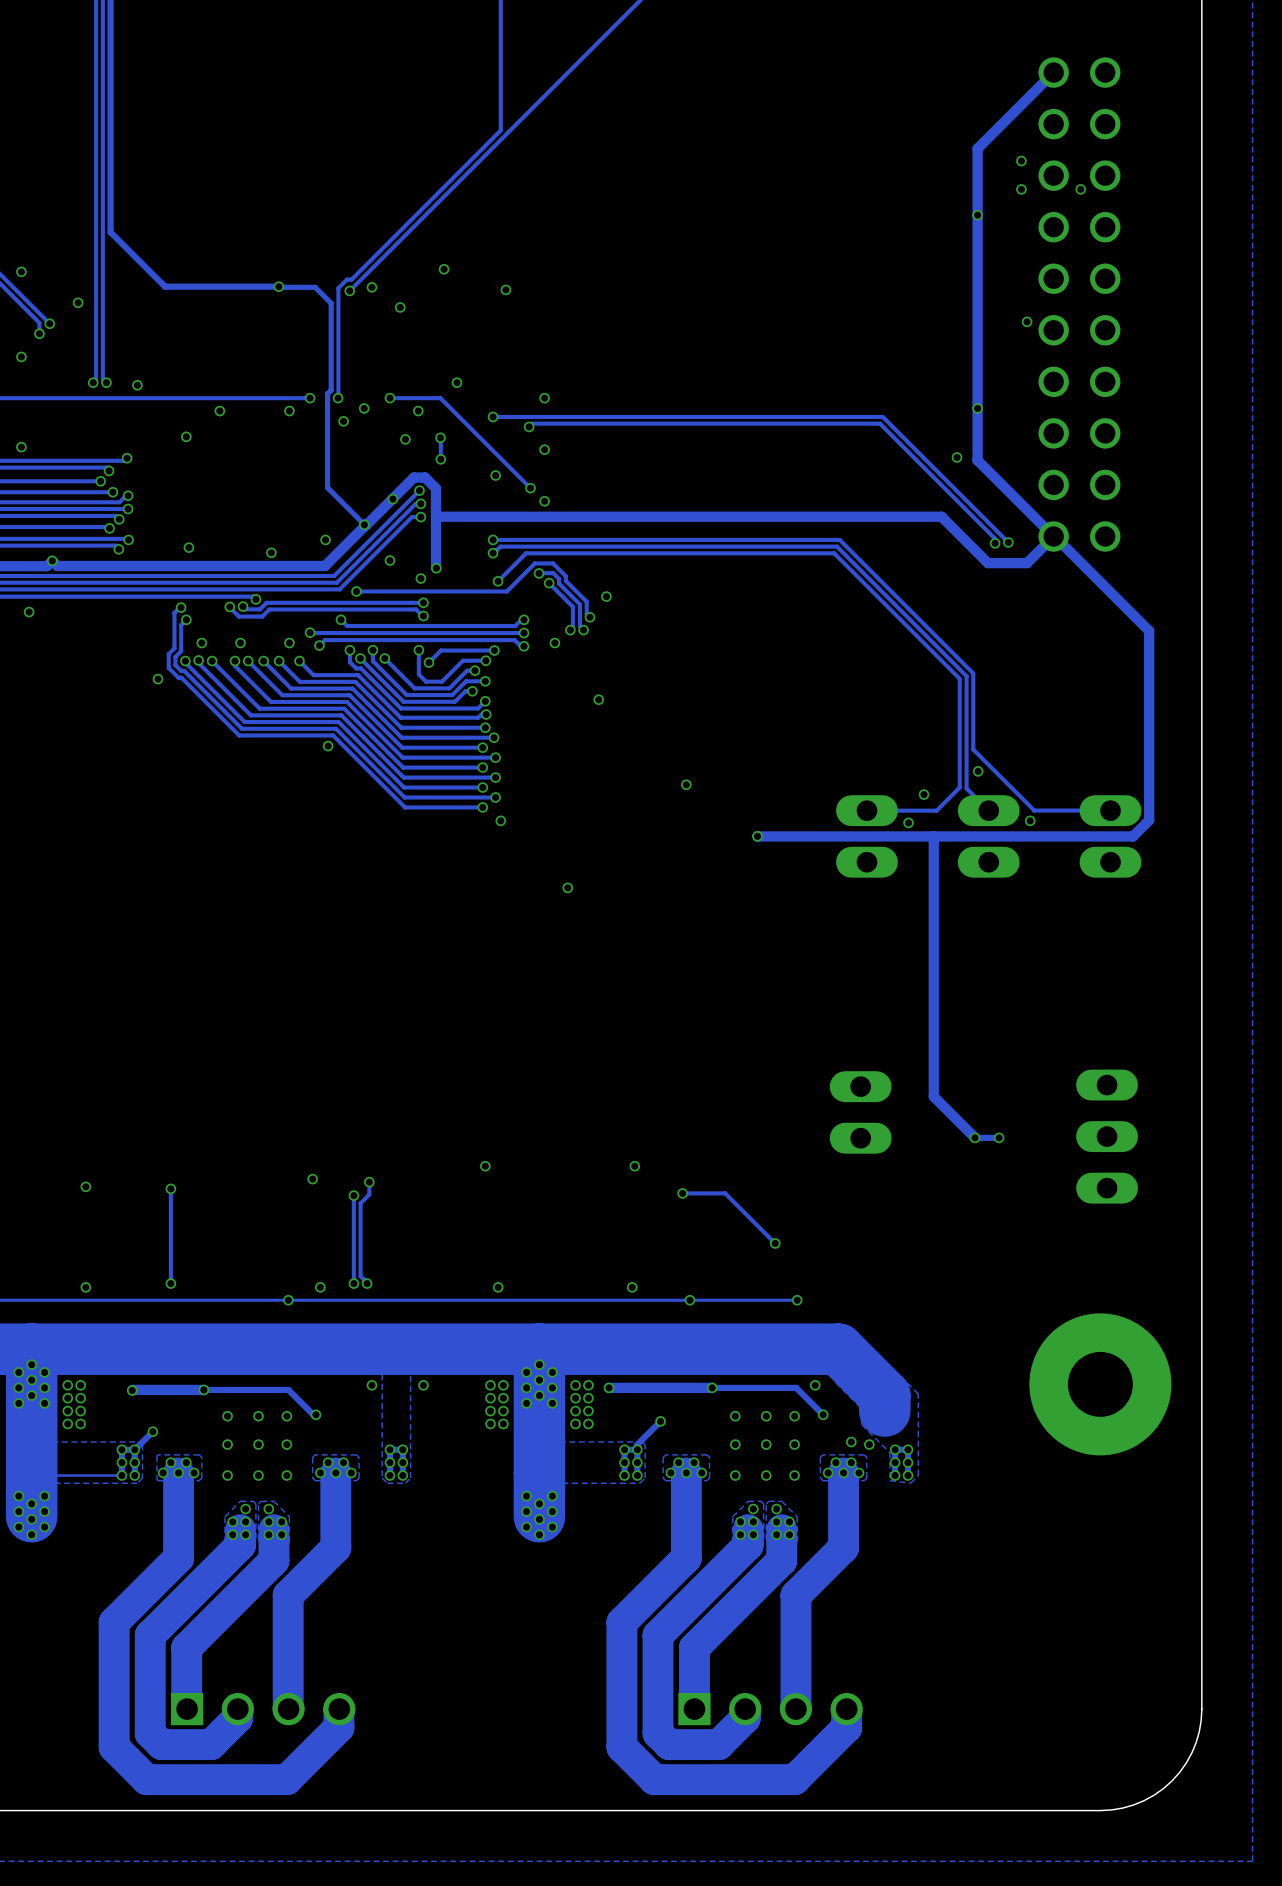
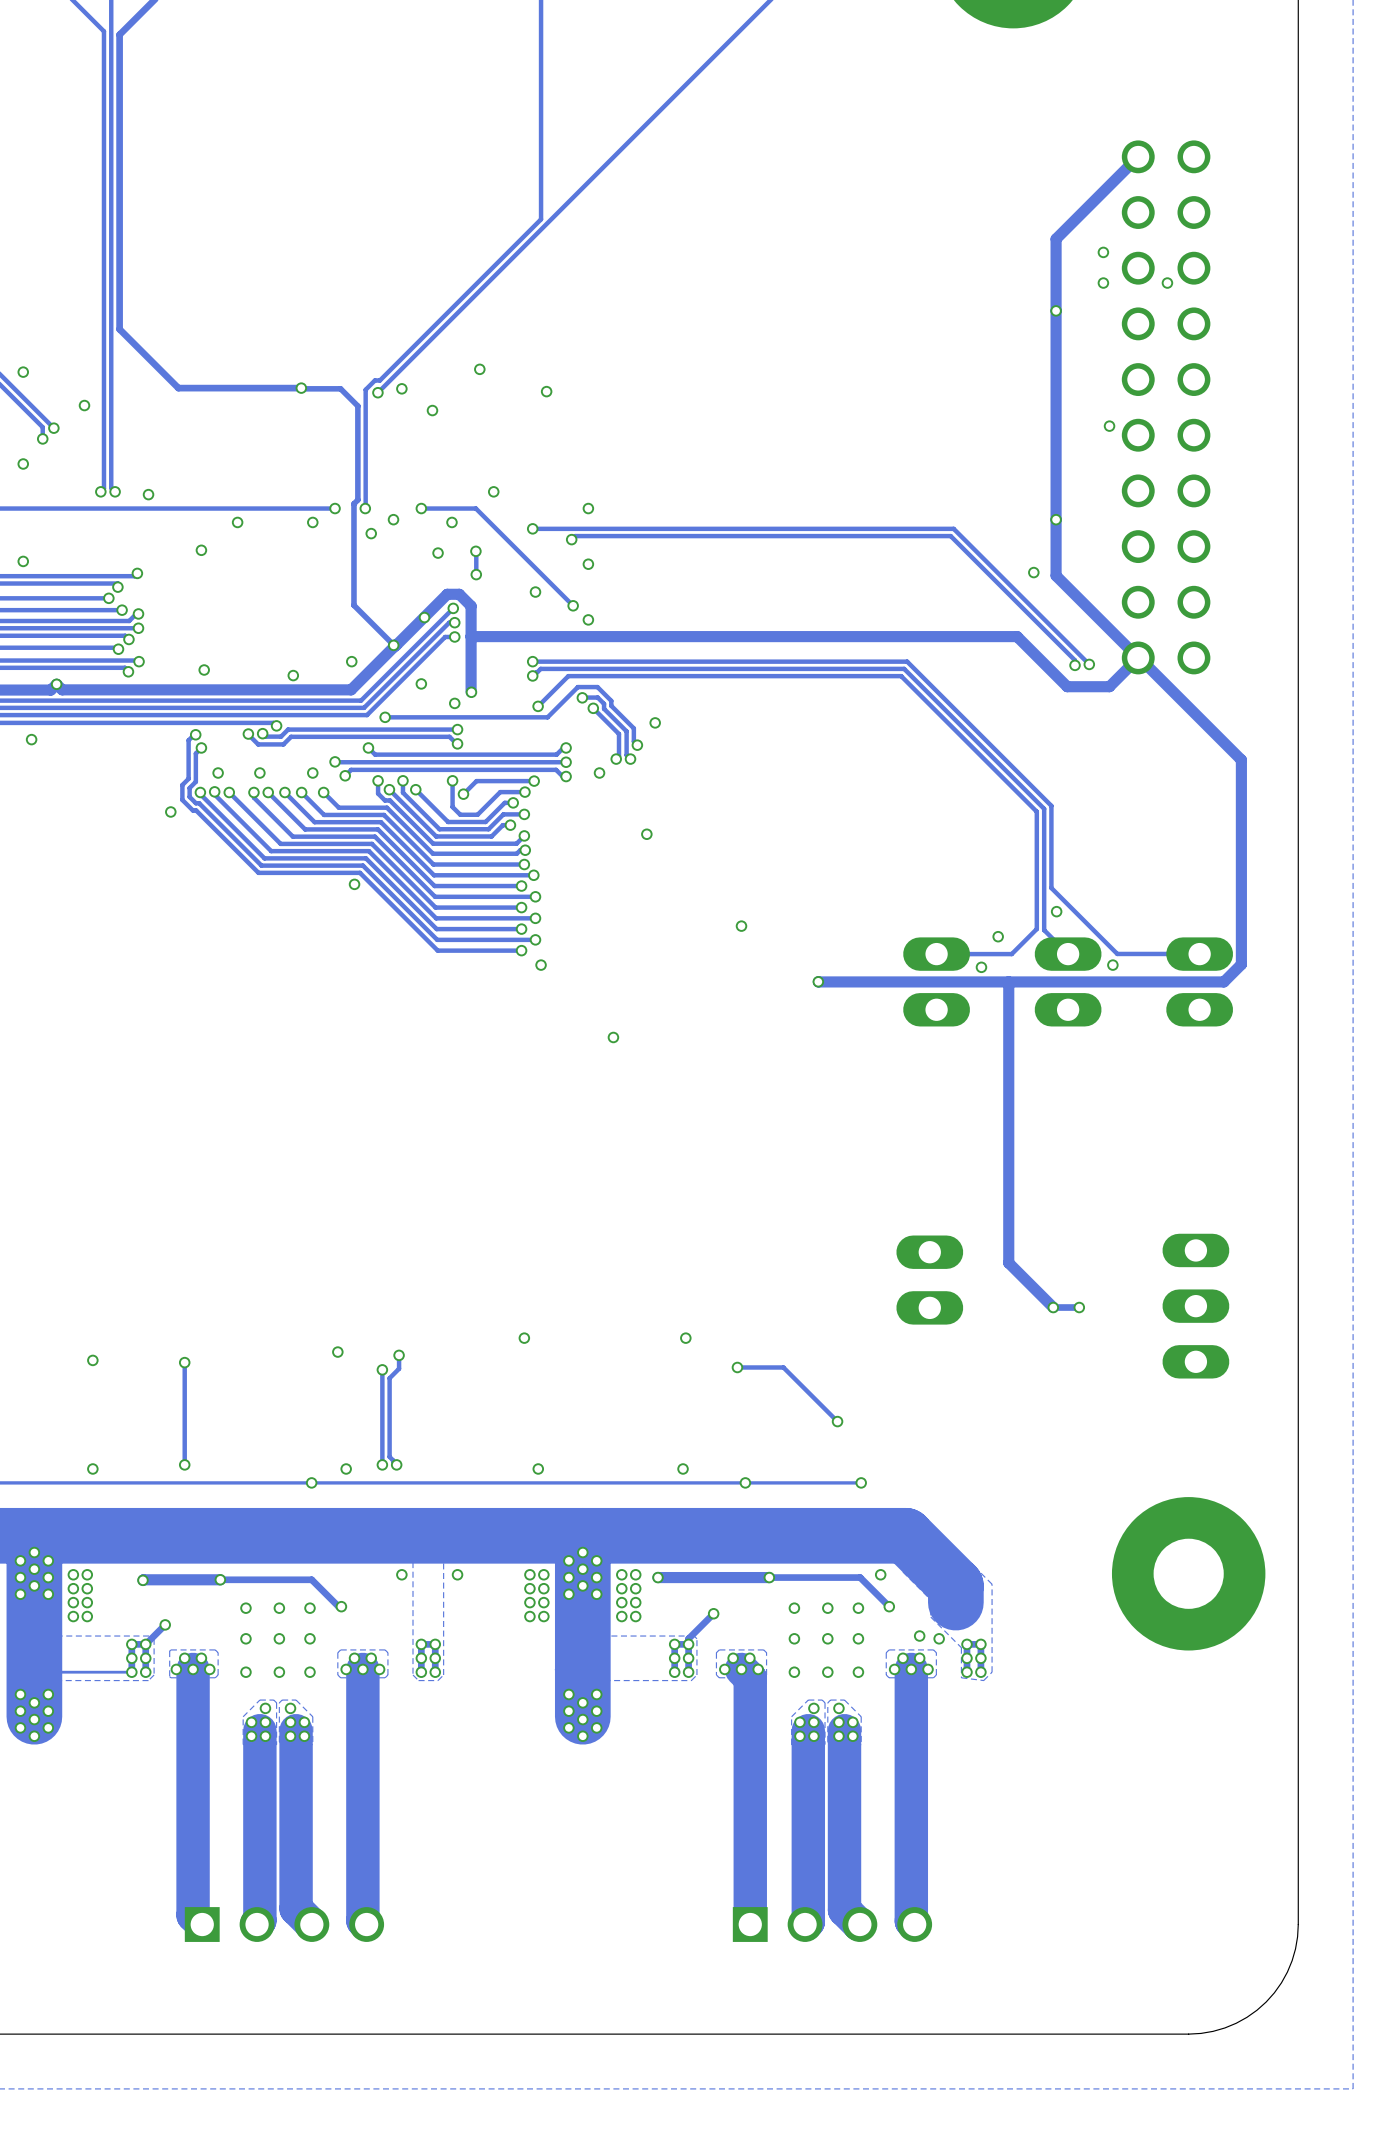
track: (686, 1472) (686, 1557) (621, 1622) (621, 1747) (654, 1779) (794, 1779) (846, 1727) (846, 1709) -> (741, 1669) (750, 1678) (750, 1858)
track: (240, 1545) (150, 1635) (150, 1733) (161, 1744) (211, 1744) (237, 1718) (237, 1709) -> (259, 1747) (259, 1920) (257, 1924)
track: (748, 1545) (658, 1635) (658, 1733) (669, 1744) (718, 1744) (745, 1718) (745, 1709) -> (808, 1747) (808, 1921) (805, 1924)
track: (335, 1547) (288, 1595) (288, 1709) -> (362, 1750) (362, 1920) (366, 1924)
track: (843, 1547) (795, 1595) (795, 1709) -> (911, 1750) (911, 1921) (914, 1924)
track: (178, 1557) (114, 1622) (114, 1747) (146, 1779) (286, 1779) (338, 1727) (338, 1709) -> none
track: (273, 1560) (186, 1647) (186, 1709) -> (193, 1761) (193, 1915) (202, 1924)
track: none -> (296, 1764) (296, 1908) (311, 1924)
track: (781, 1560) (694, 1647) -> (844, 1764) (844, 1909) (859, 1924)

